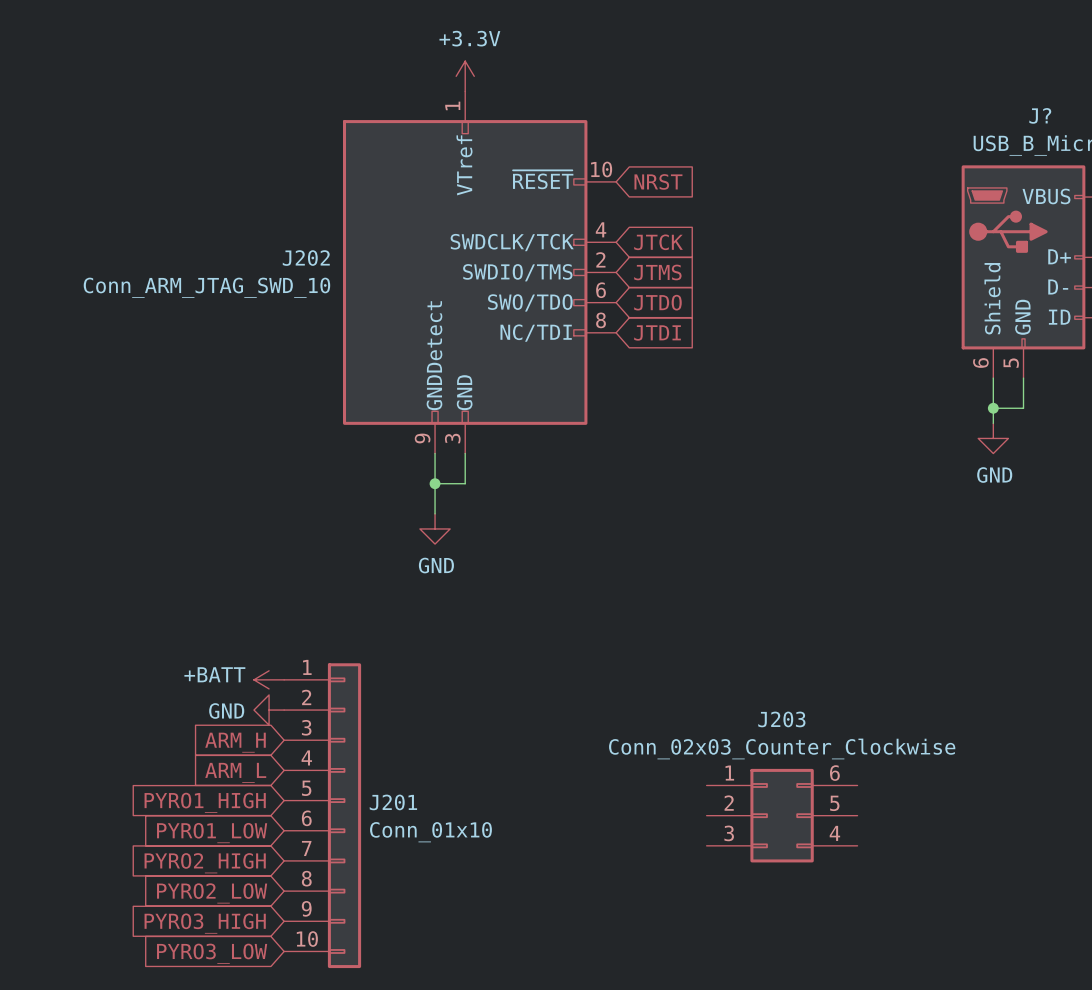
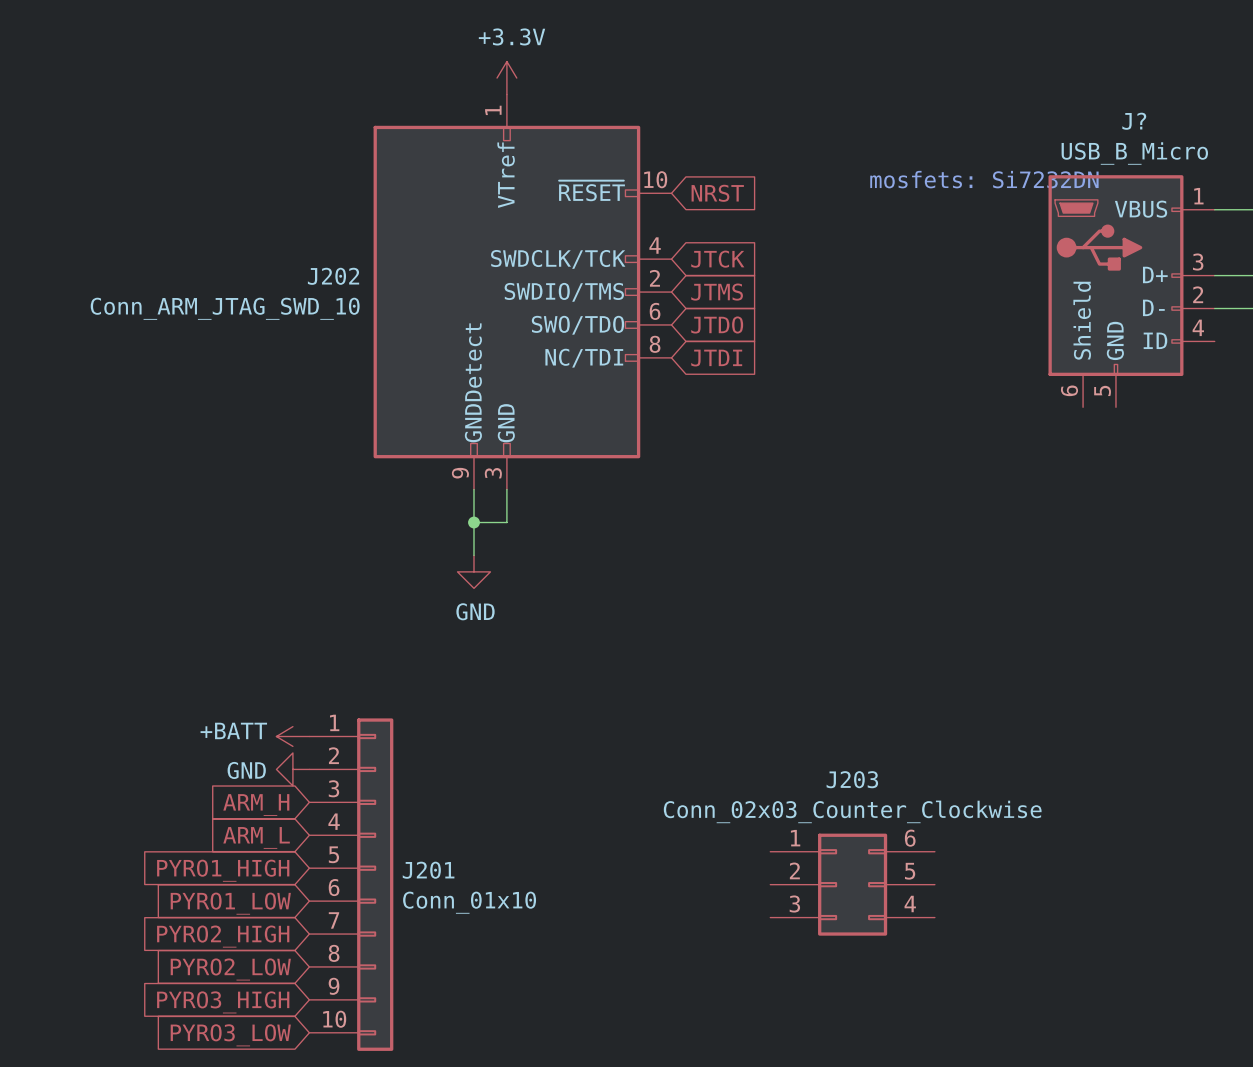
text: none -> mosfets: Si7232DN (984, 179)
wire: (993, 378) (993, 423) -> none
wire: (1023, 378) (1023, 408) (993, 408) -> none
junction: (993, 408) -> none
power symbol: GND (993, 438) -> none

